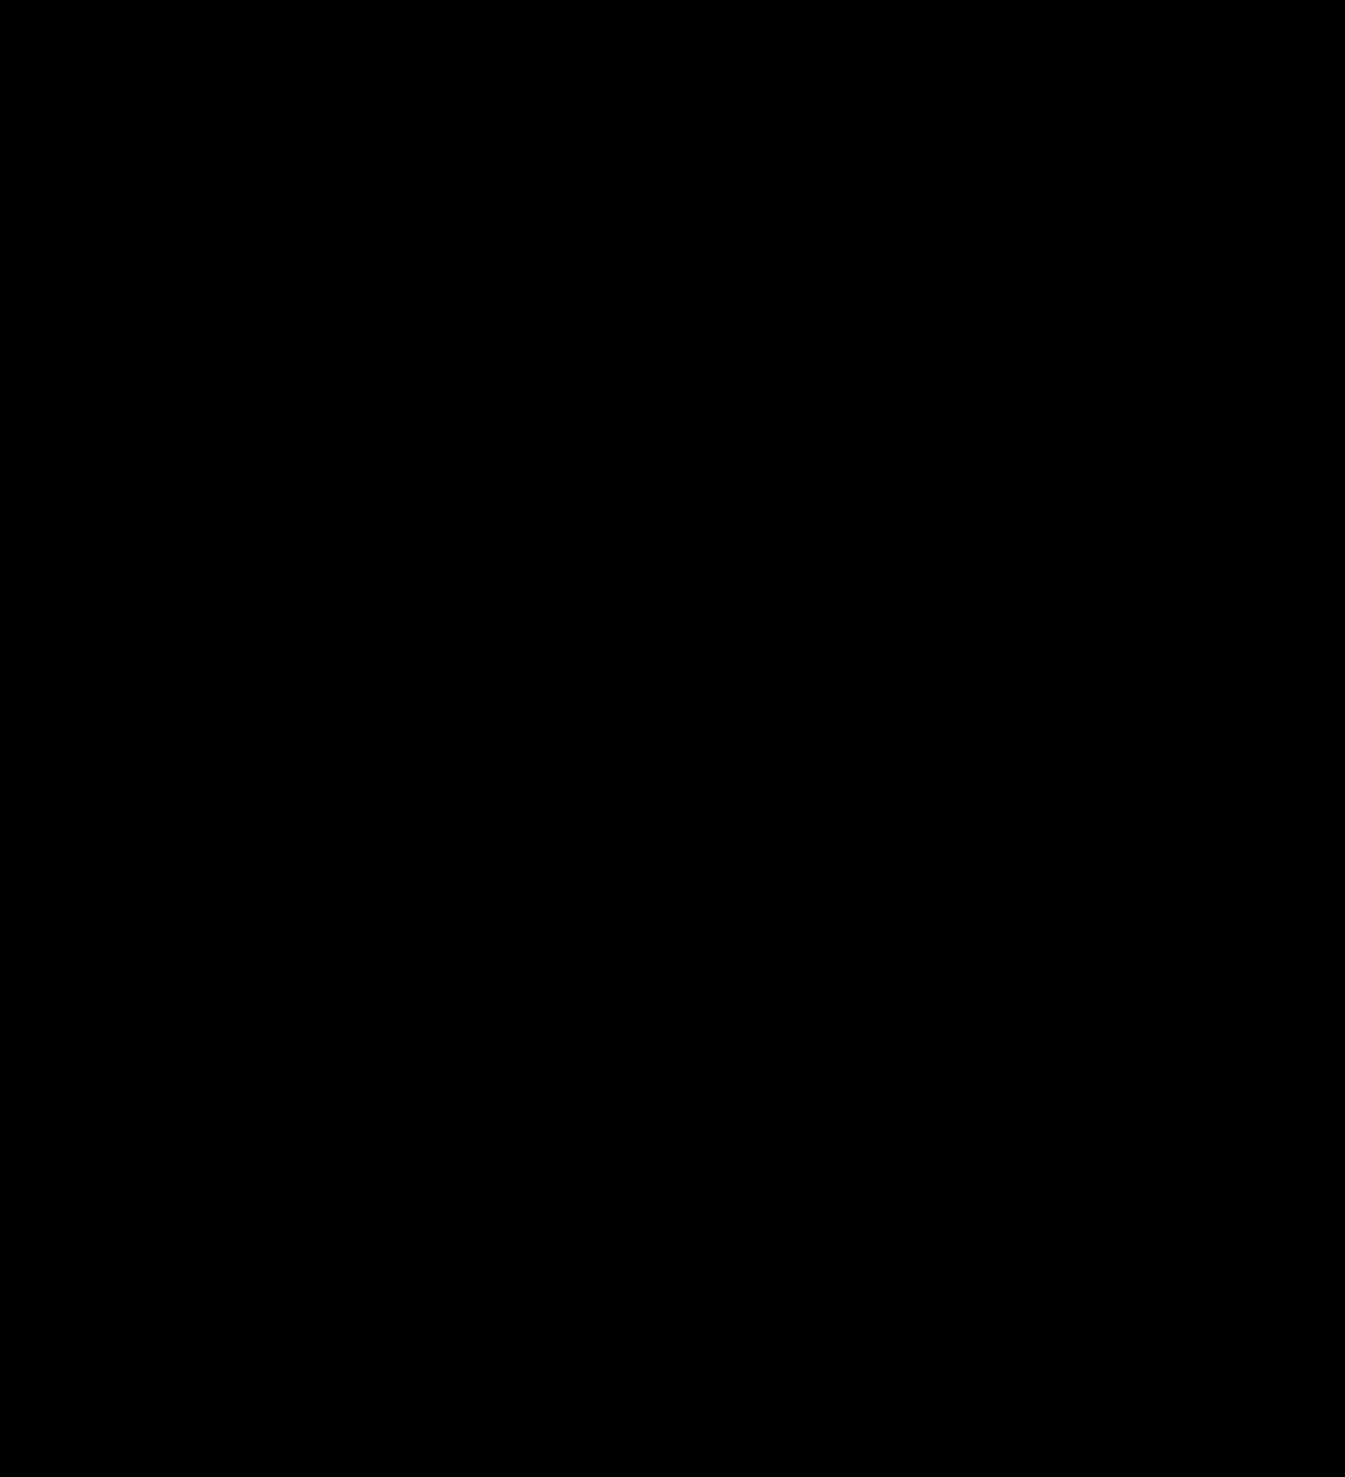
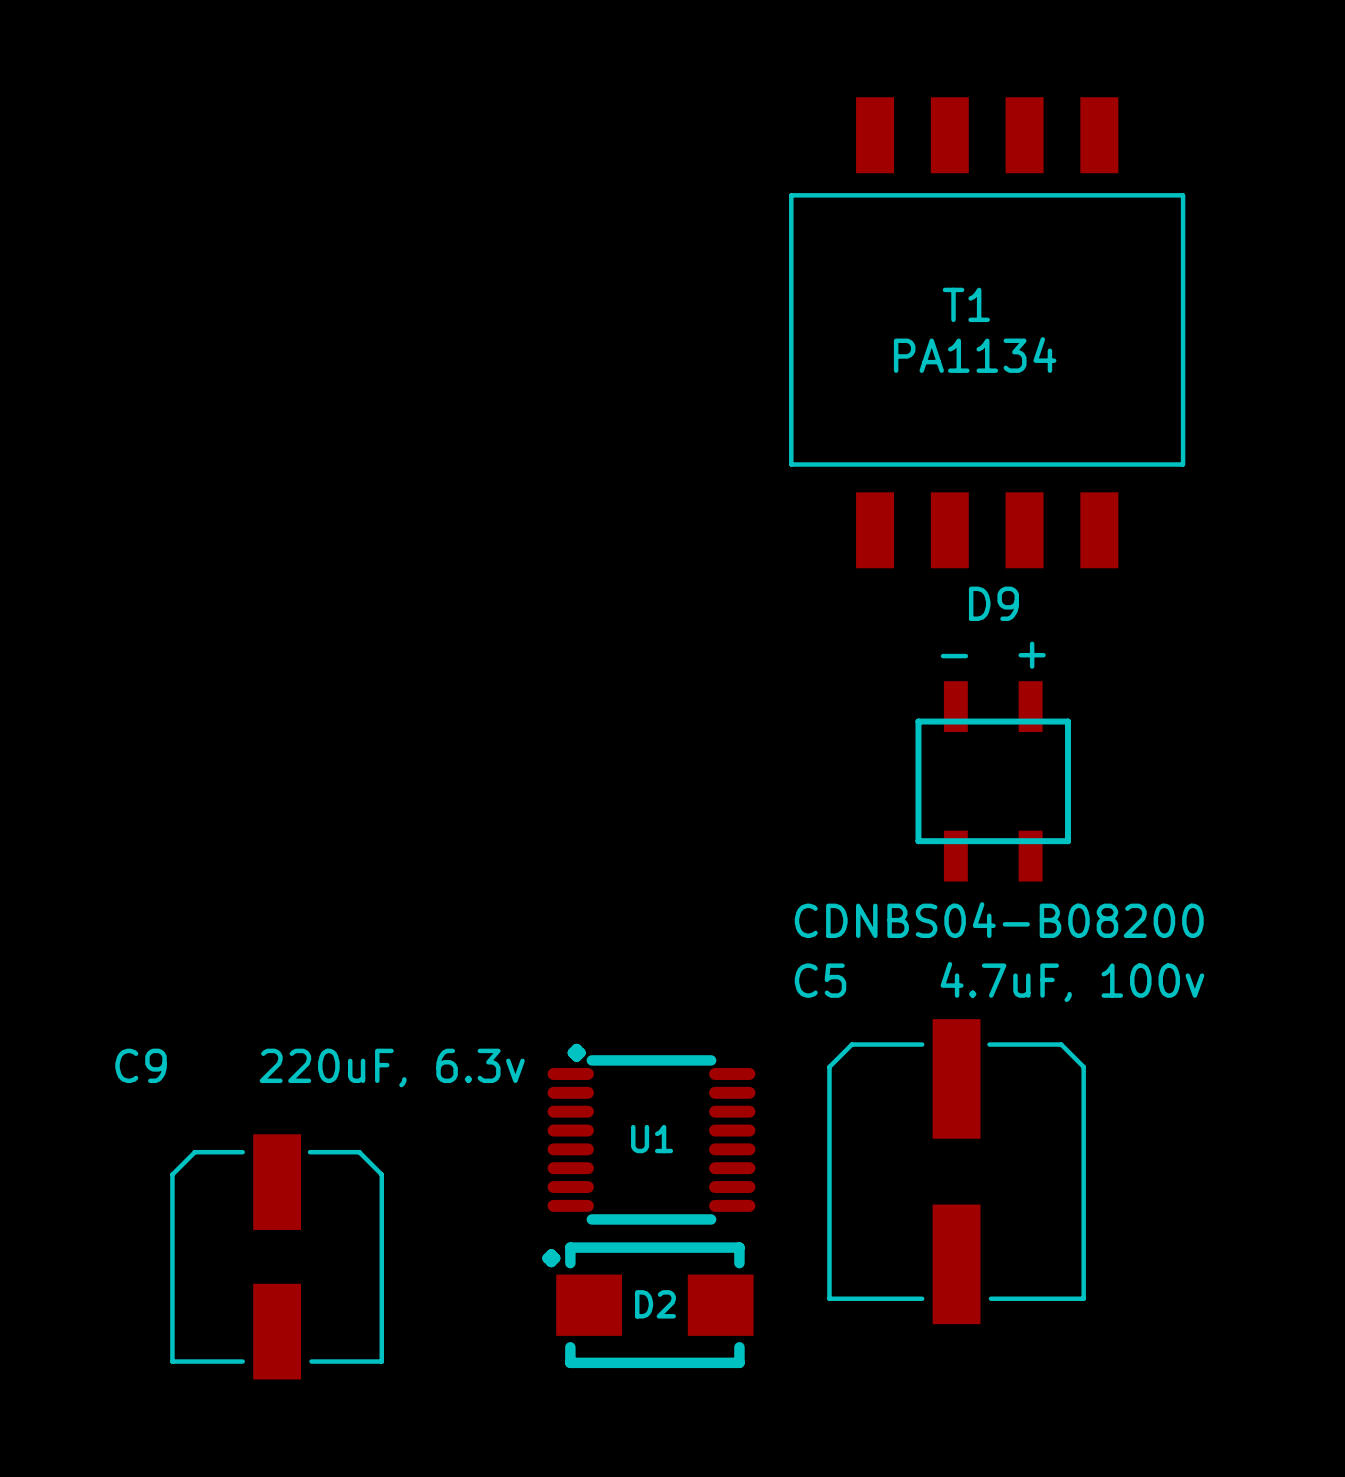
T1: none -> PA1134 (987, 332)
D9: none -> CDNBS04-B08200 (993, 781)
U1: none -> (651, 1134)
C5: none -> 4.7uF, 100v (956, 1171)
C9: none -> 220uF, 6.3v (277, 1256)
D2: none -> (647, 1305)

